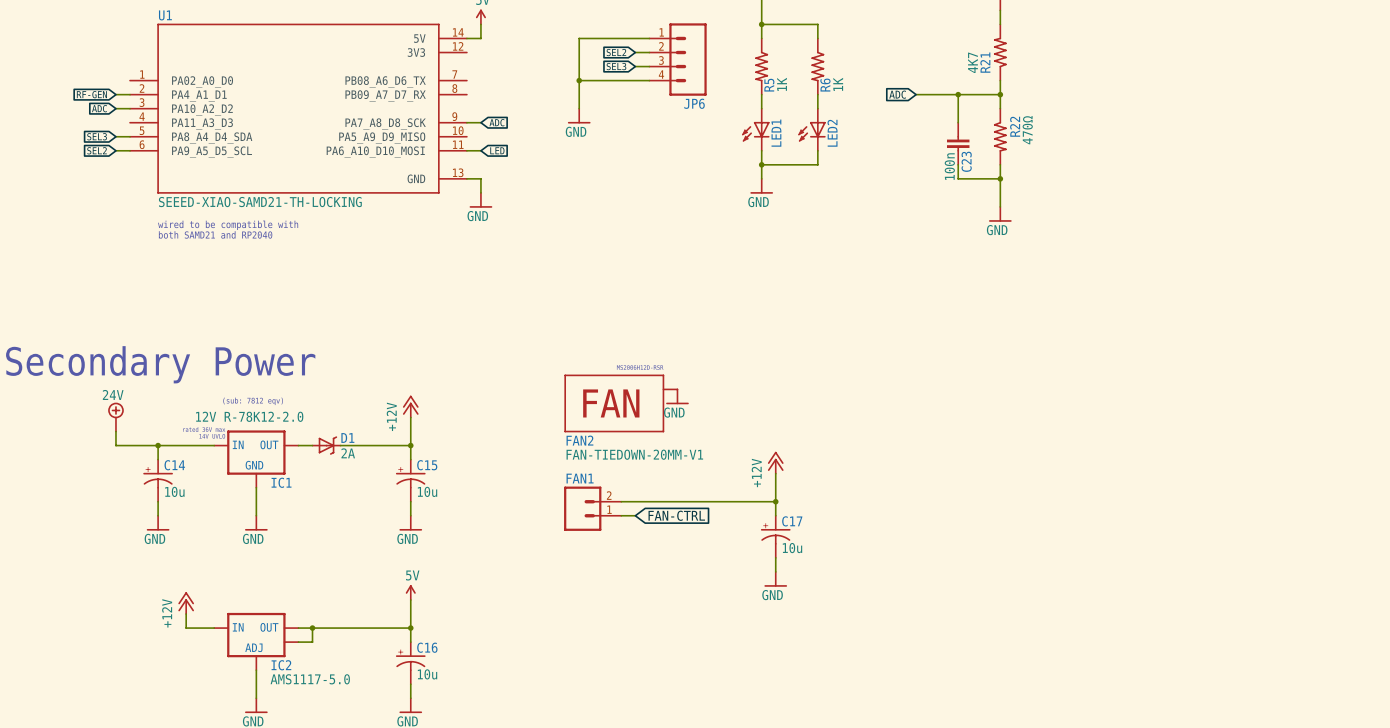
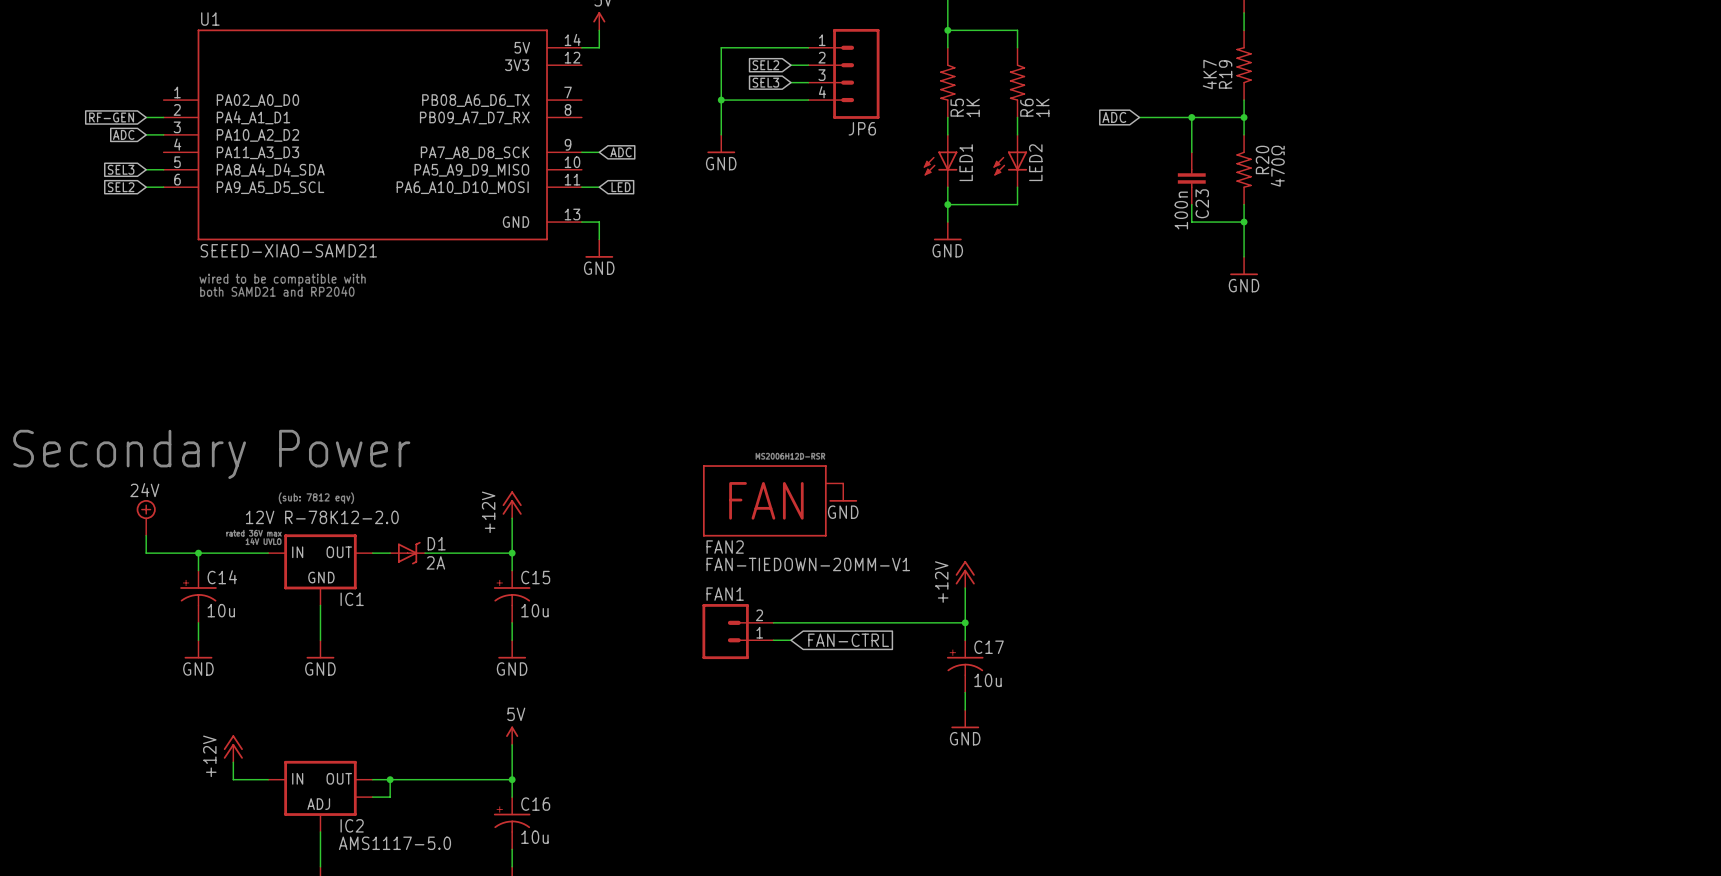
R21 name: R21 (985, 62) -> R19 (1225, 74)
R22 name: R22 (1015, 126) -> R20 (1262, 159)
U1 value: SEEED-XIAO-SAMD21-TH-LOCKING (260, 202) -> SEEED-XIAO-SAMD21 (288, 250)

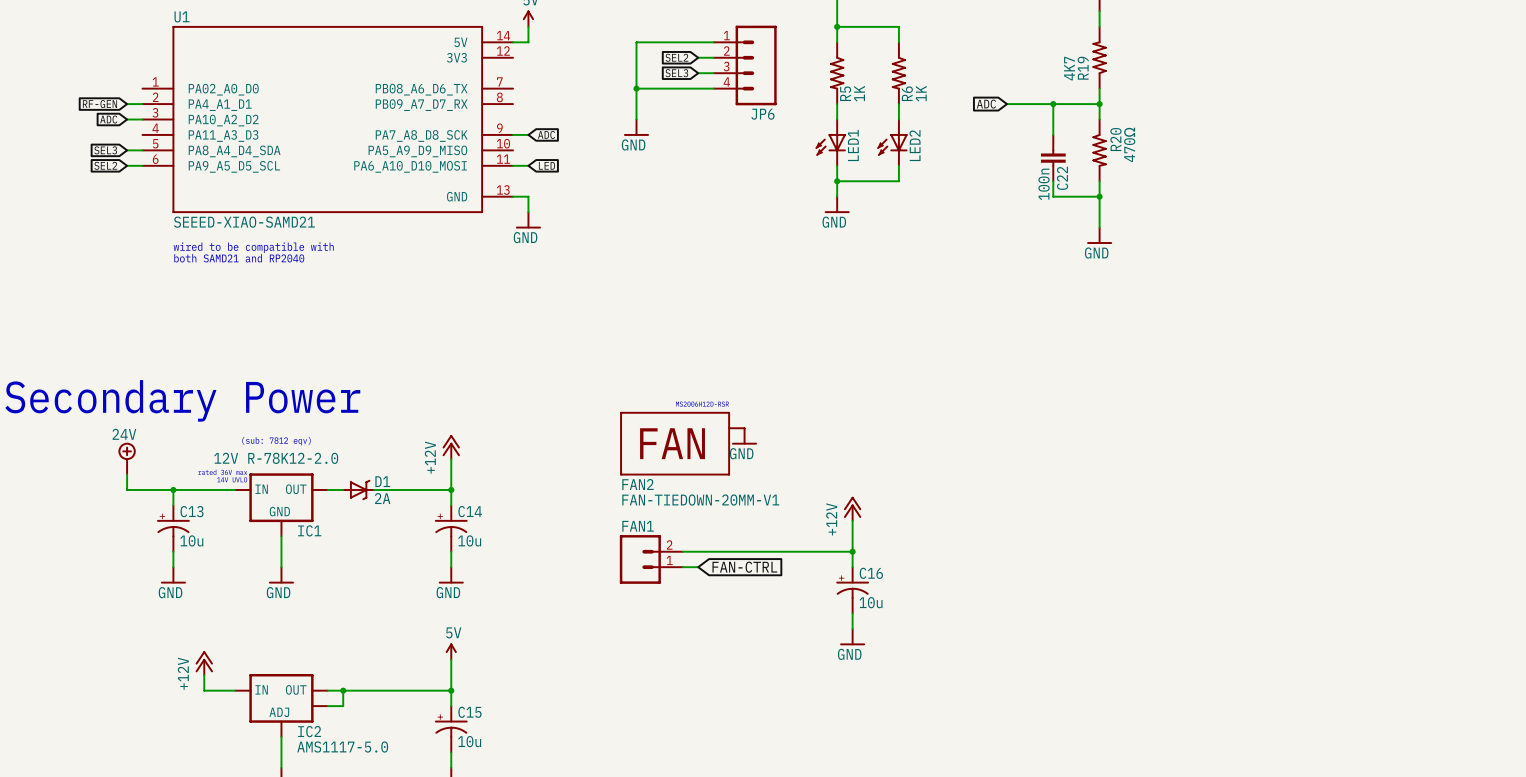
C23 name: C23 (1202, 203) -> C22 (1062, 178)
C14 name: C14 (222, 577) -> C13 (192, 511)
C15 name: C15 (535, 577) -> C14 (470, 511)
C17 name: C17 (989, 647) -> C16 (871, 573)
C16 name: C16 (535, 804) -> C15 (469, 712)

